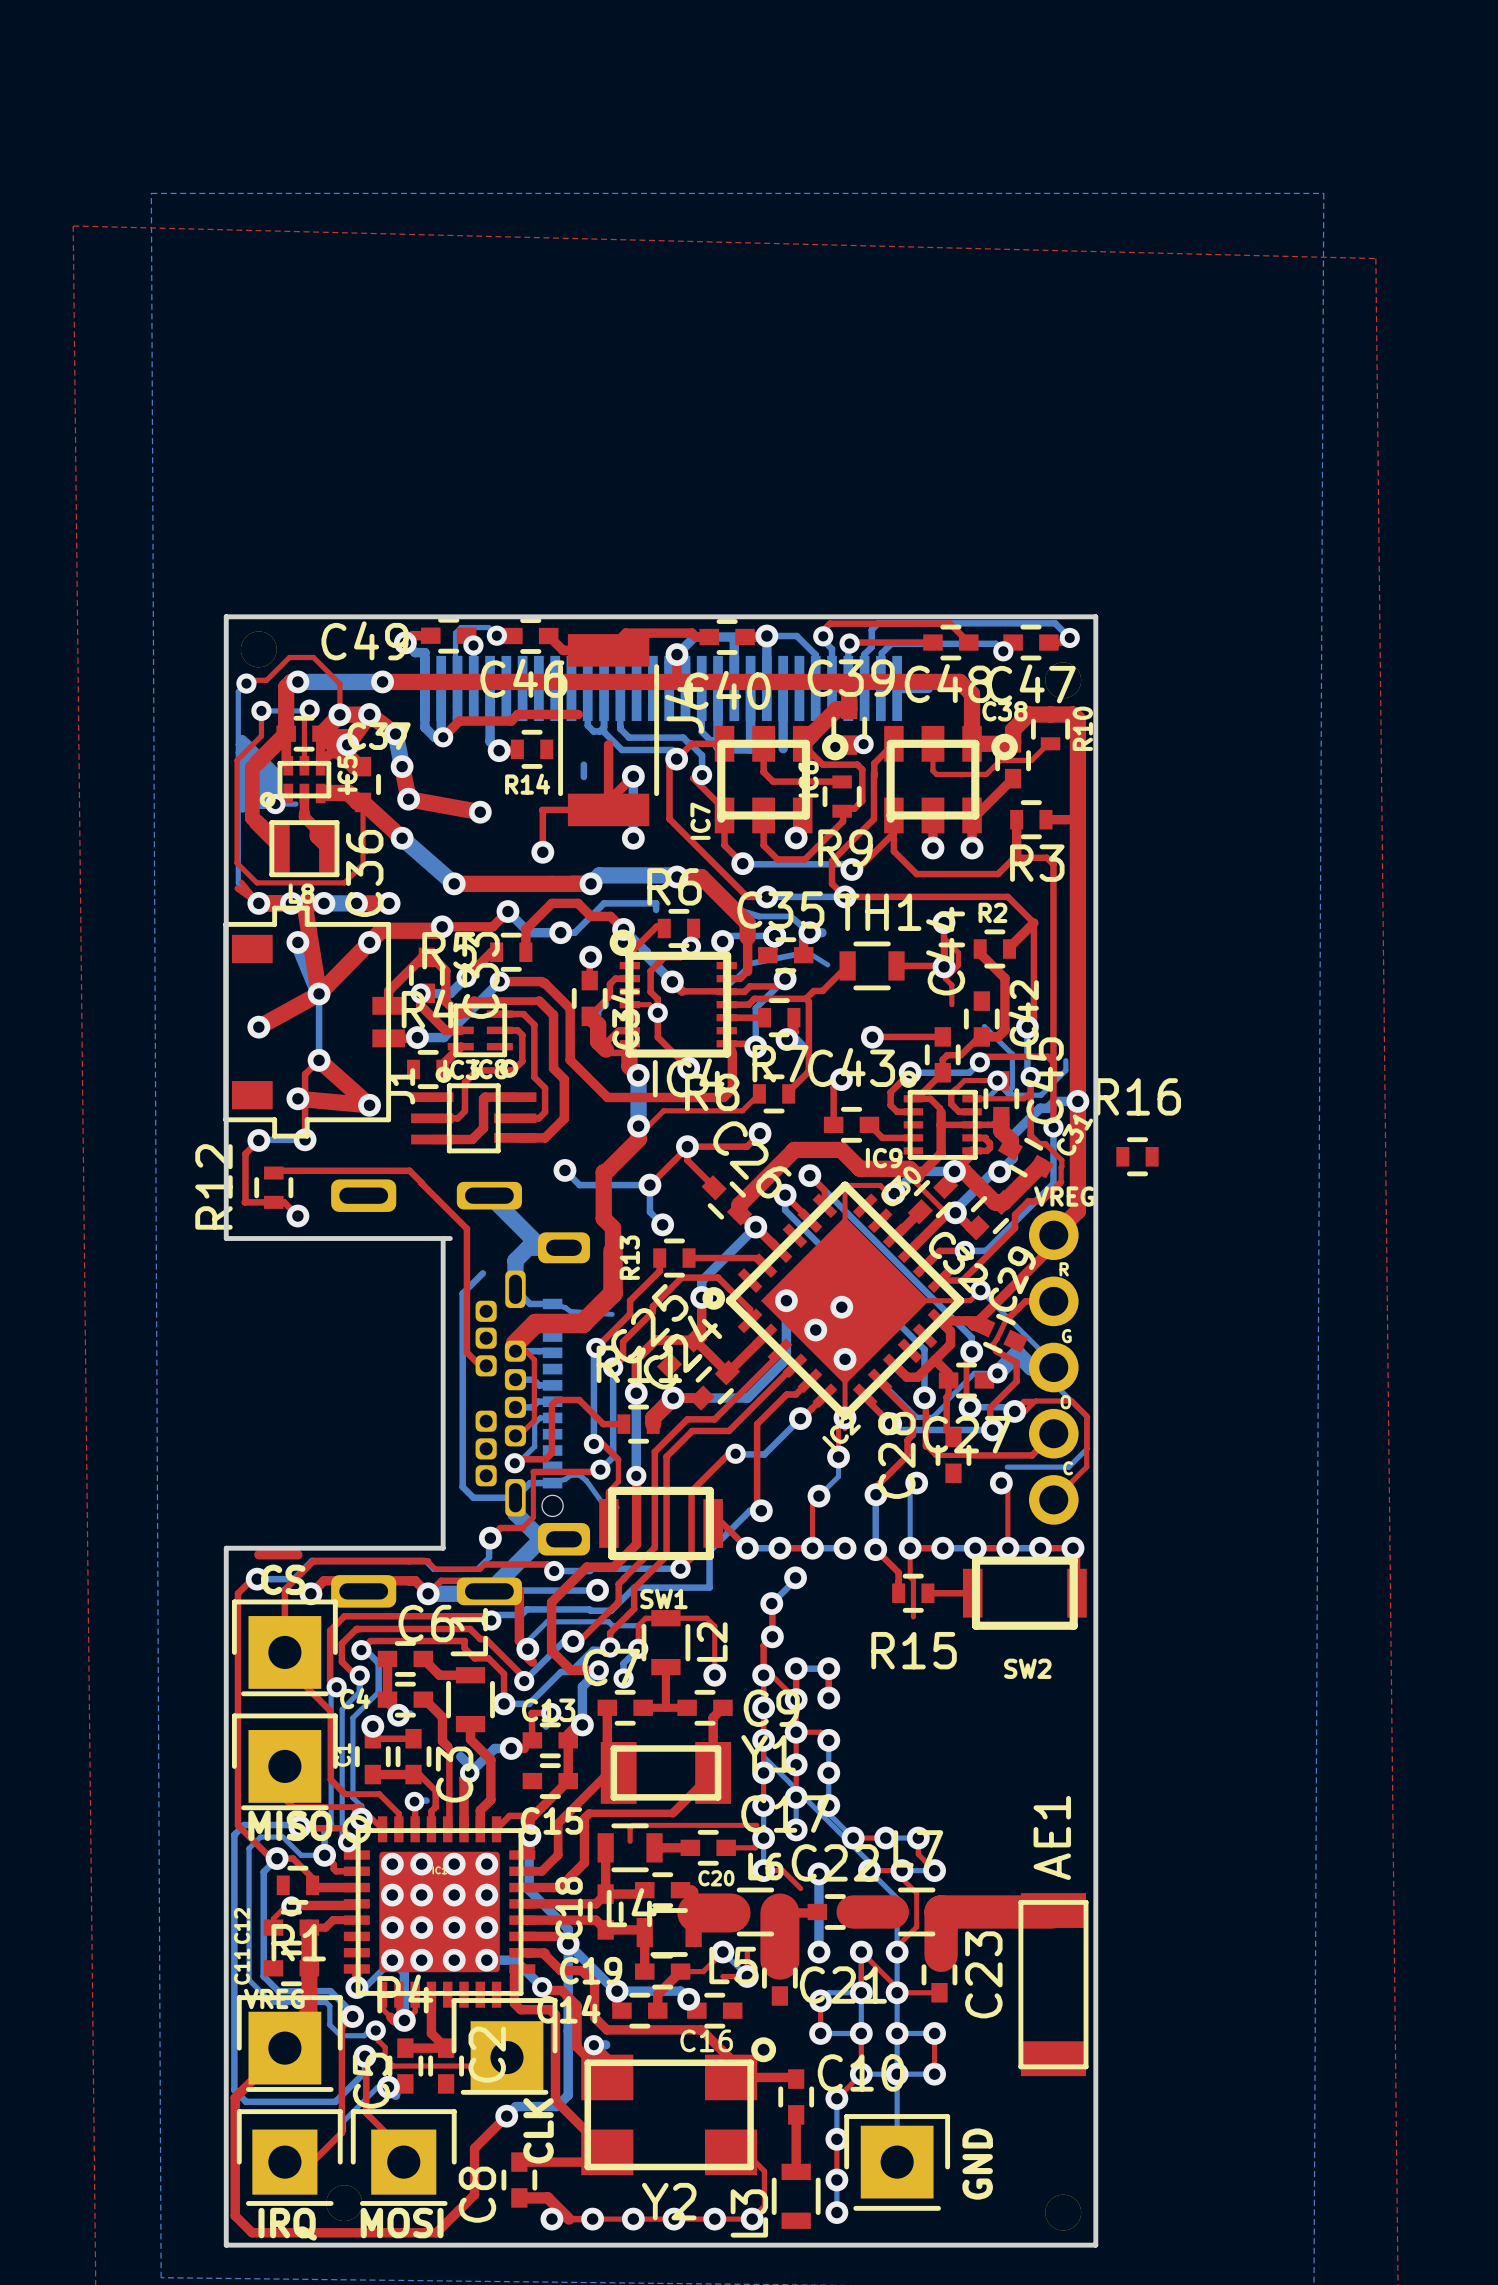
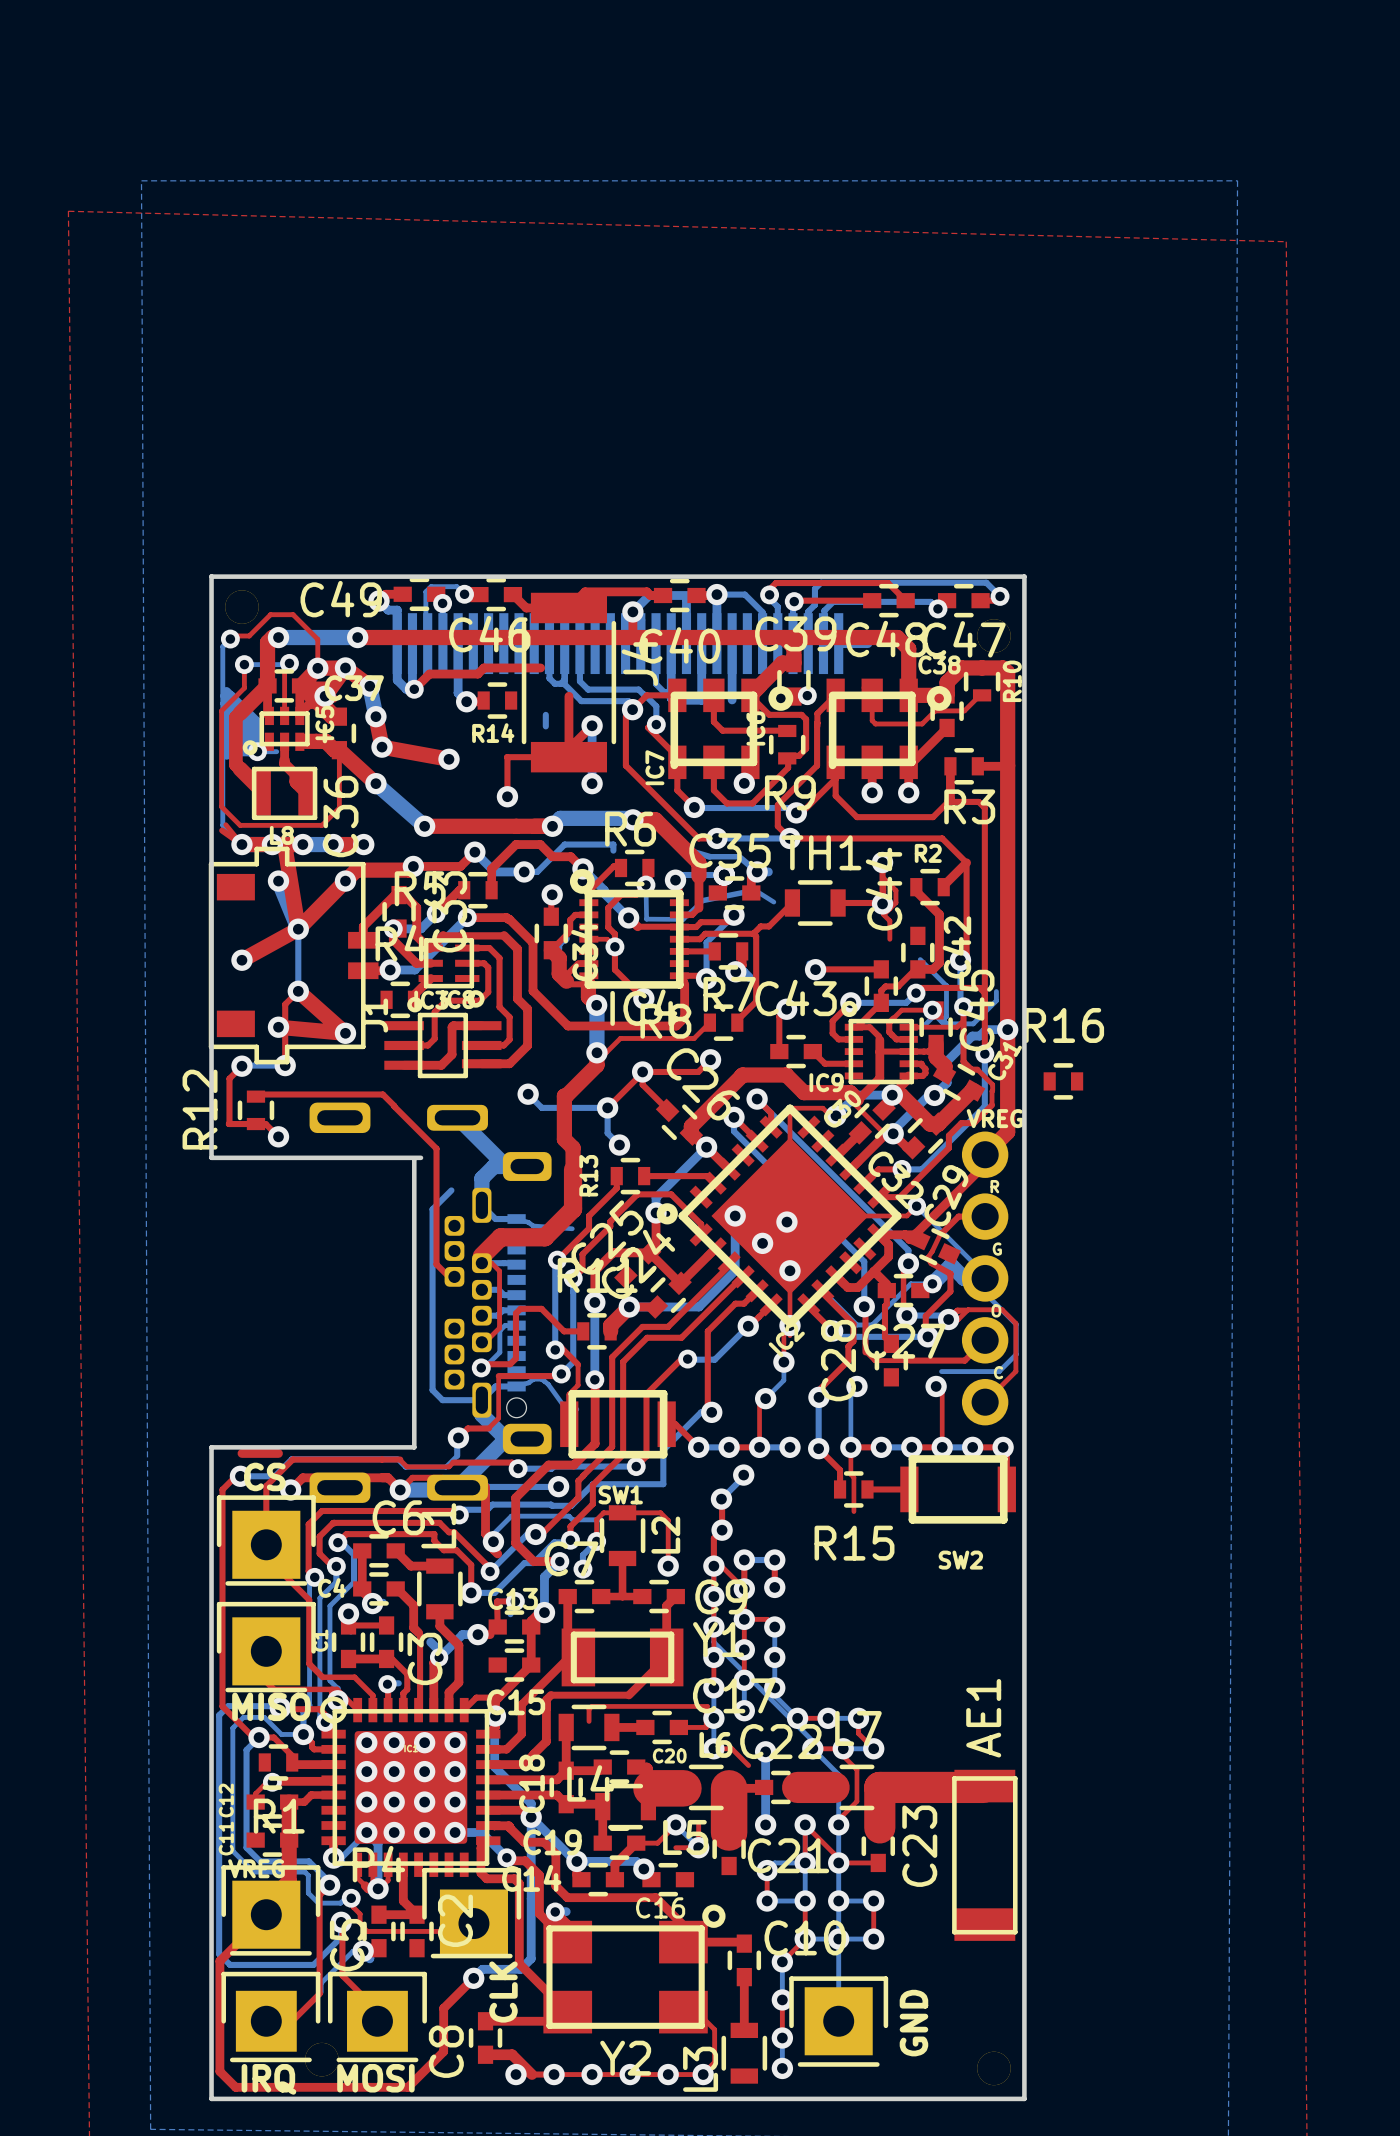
bottom track: none -> (645, 885) (646, 919) (683, 919)

